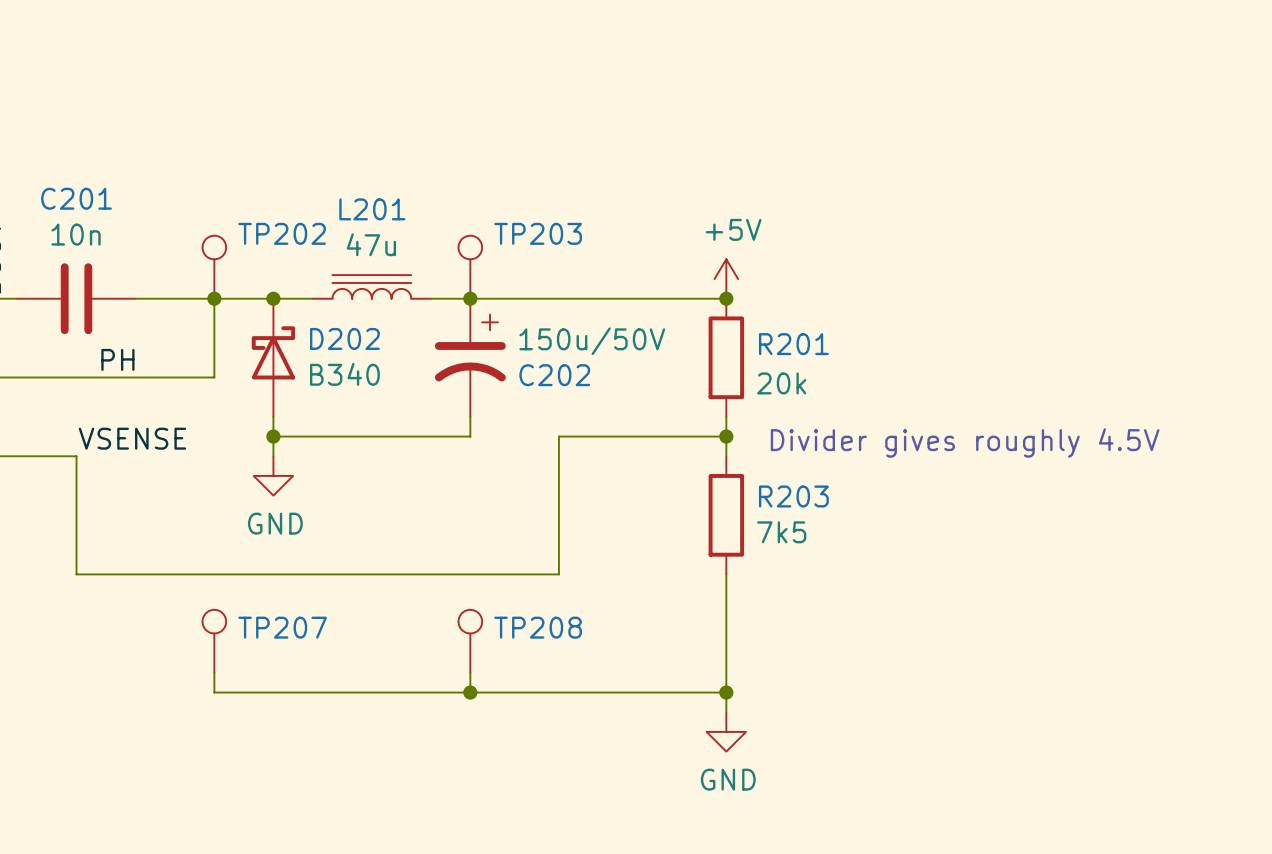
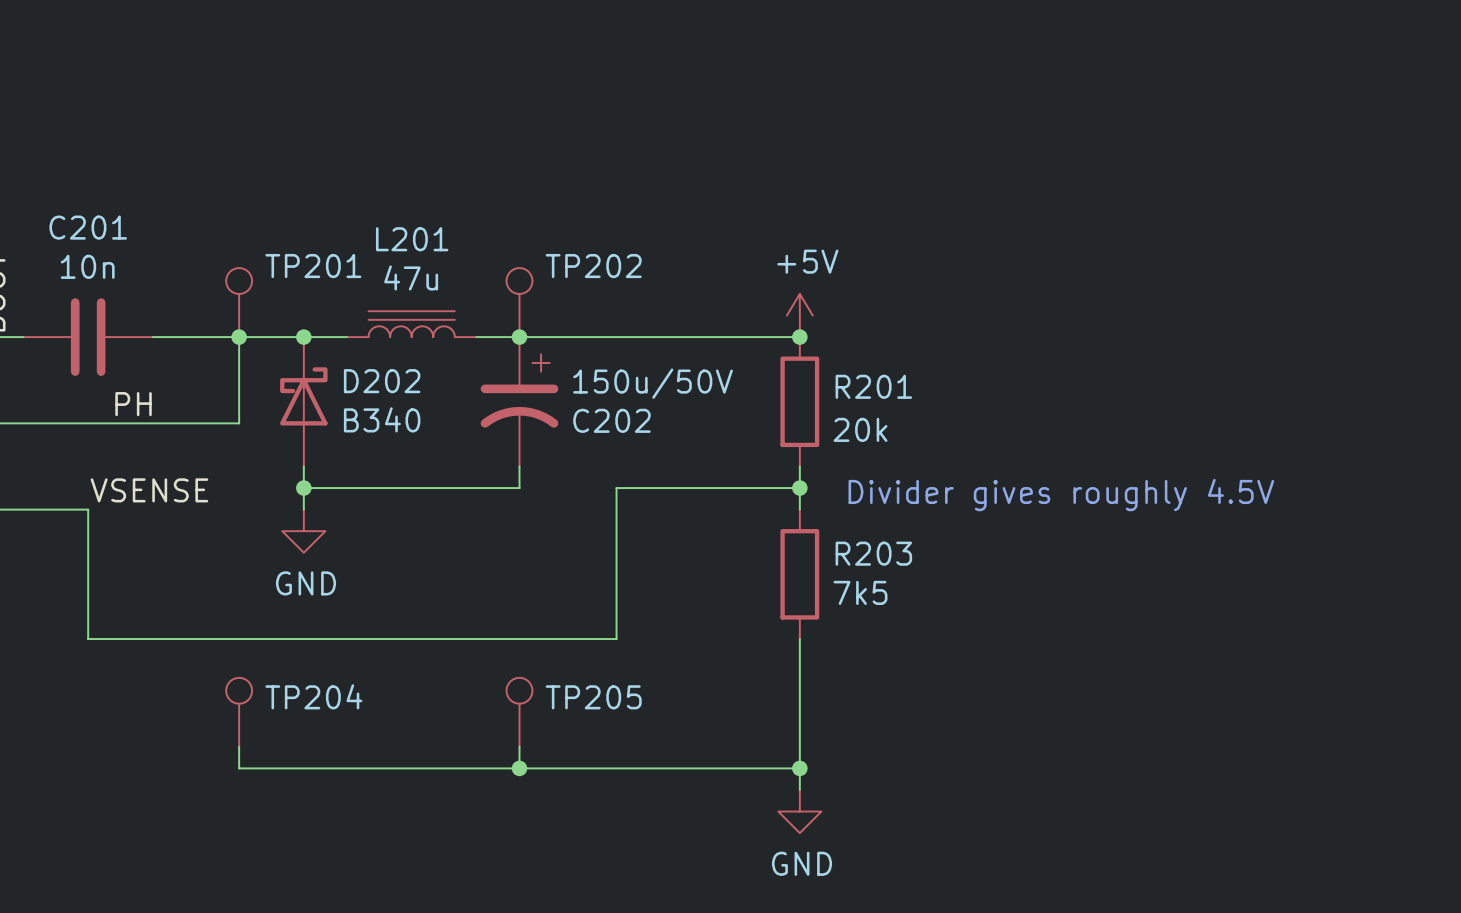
TP202 name: TP202 (282, 233) -> TP201 (313, 266)
TP203 name: TP203 (538, 233) -> TP202 (593, 266)
TP207 name: TP207 (282, 627) -> TP204 (313, 696)
TP208 name: TP208 (538, 627) -> TP205 (593, 697)

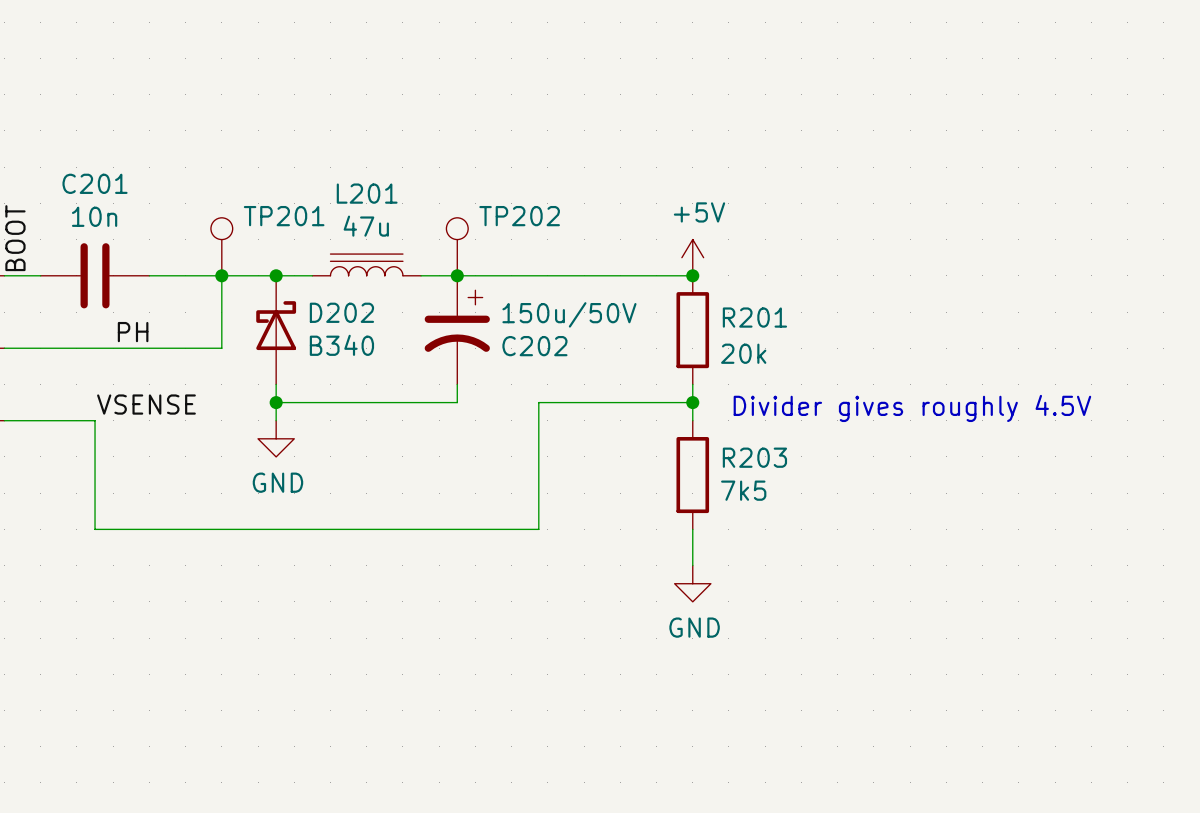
wire: (799, 682) (799, 789) -> none
TP204: (239, 712) -> none
TP205: (519, 712) -> none
wire: (239, 746) (239, 768) (799, 768) -> none
wire: (519, 746) (519, 768) -> none
junction: (519, 768) -> none
junction: (799, 768) -> none
power symbol position: GND (799, 811) -> GND (692, 583)

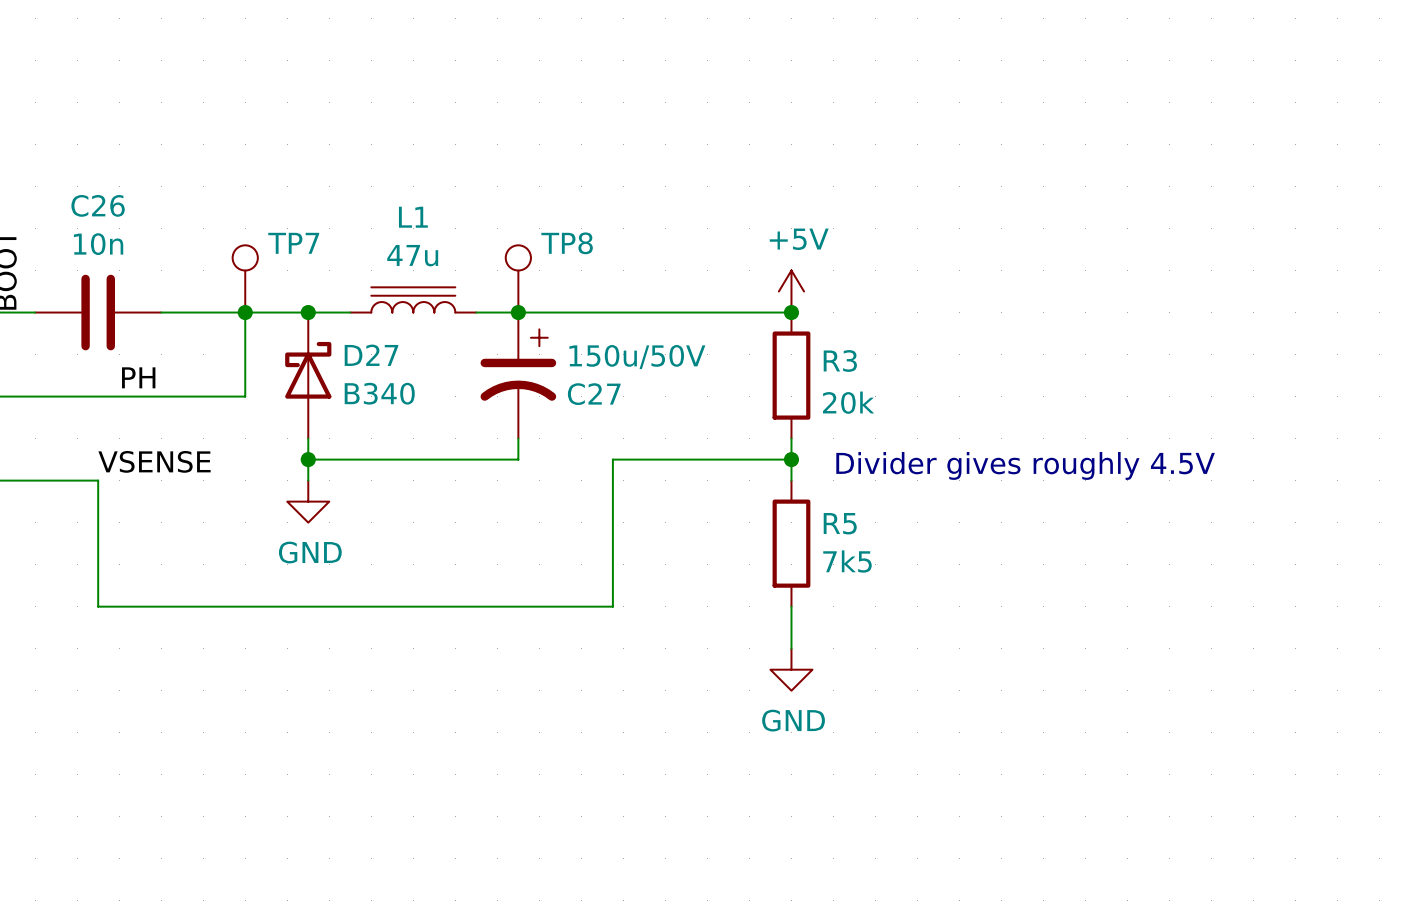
C201 name: C201 (95, 183) -> C26 (98, 205)
L201 name: L201 (367, 193) -> L1 (413, 217)
TP201 name: TP201 (284, 216) -> TP7 (293, 243)
TP202 name: TP202 (519, 216) -> TP8 (567, 243)
D202 name: D202 (341, 312) -> D27 (371, 355)
R201 name: R201 (754, 317) -> R3 (840, 360)
C202 name: C202 (534, 346) -> C27 (594, 394)
R203 name: R203 (754, 457) -> R5 (840, 523)

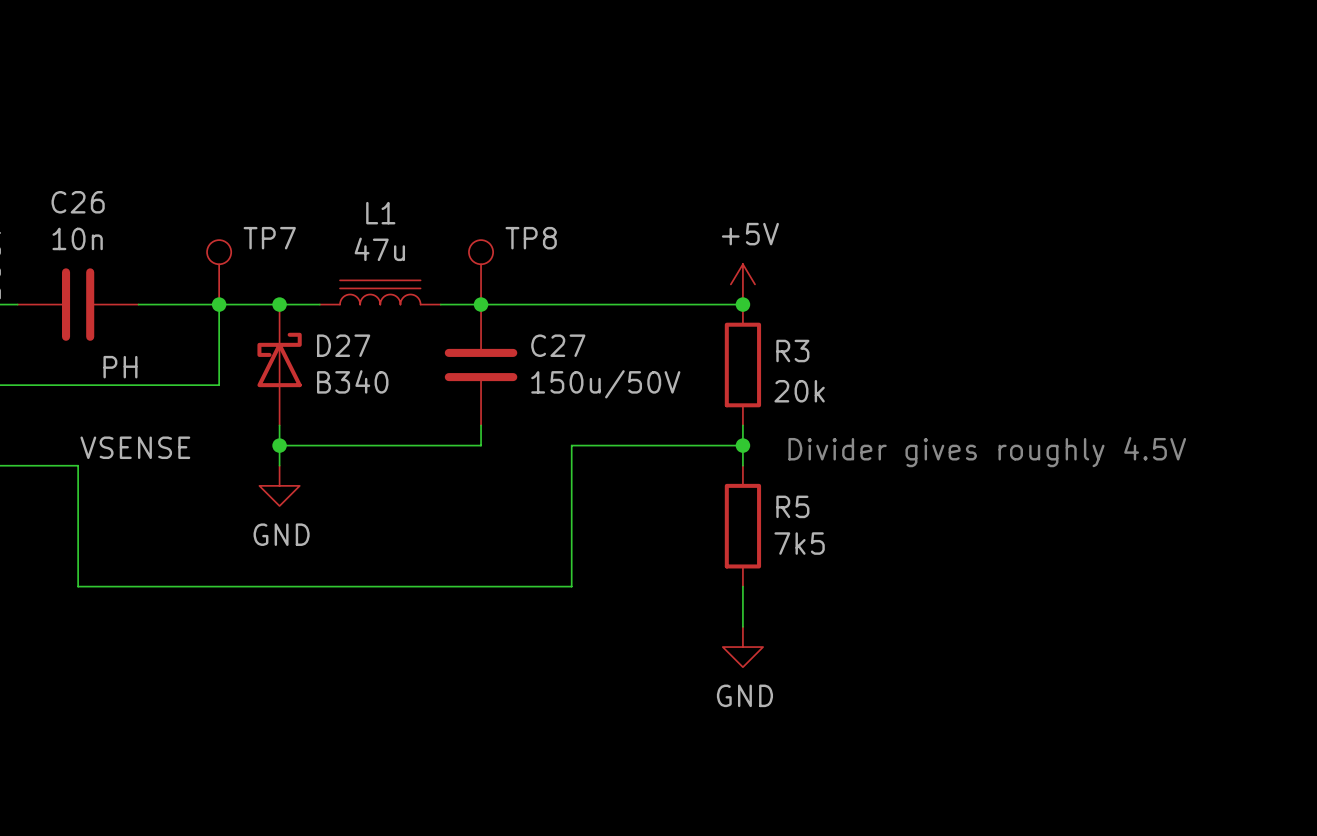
C27 symbol: [480, 312, 557, 439] -> [444, 304, 518, 426]
C27 value position: 150u/50V (637, 357) -> 150u/50V (605, 384)
C27 name position: C27 (594, 394) -> C27 (558, 345)

